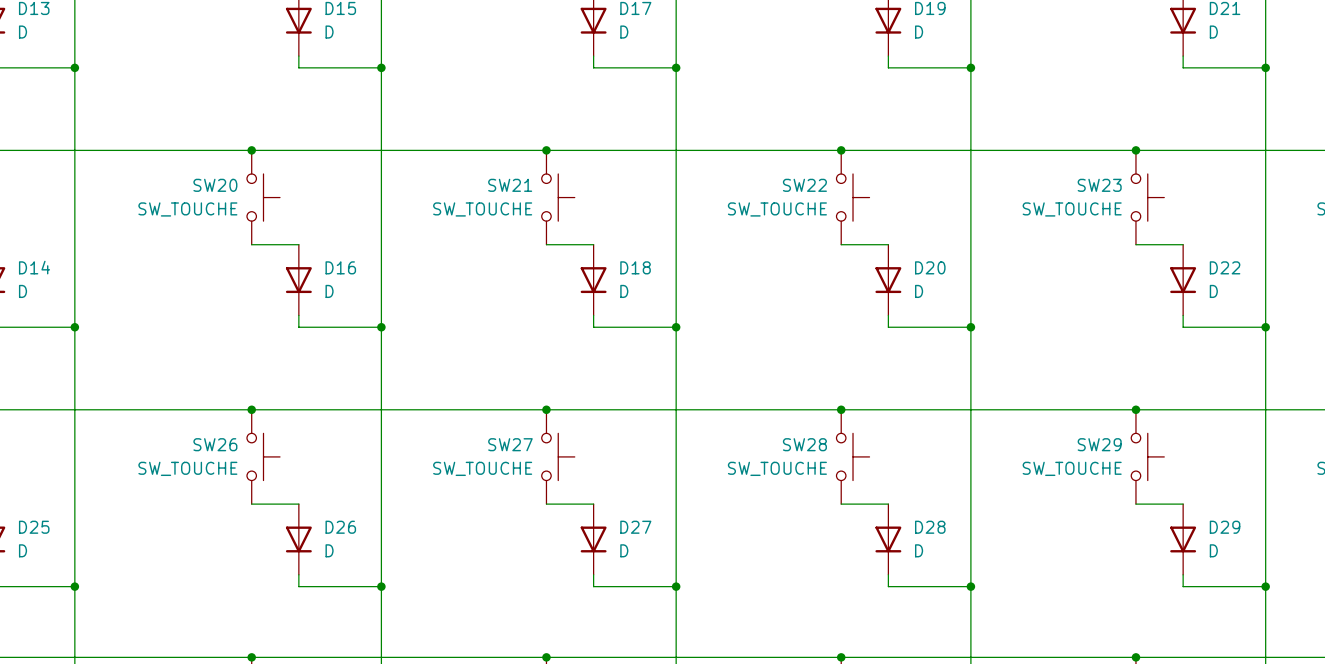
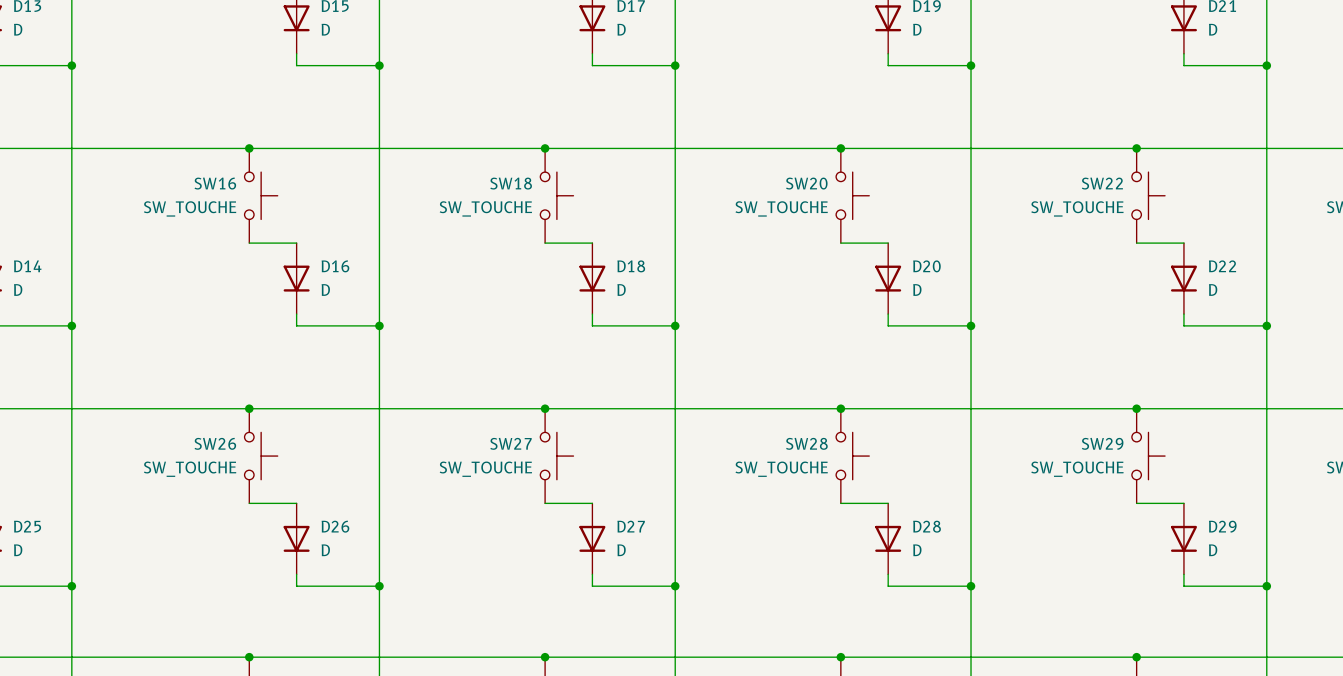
SW20 name: SW20 (215, 185) -> SW16 (215, 183)
SW21 name: SW21 (510, 185) -> SW18 (511, 183)
SW22 name: SW22 (804, 185) -> SW20 (806, 183)
SW23 name: SW23 (1099, 185) -> SW22 (1102, 183)

